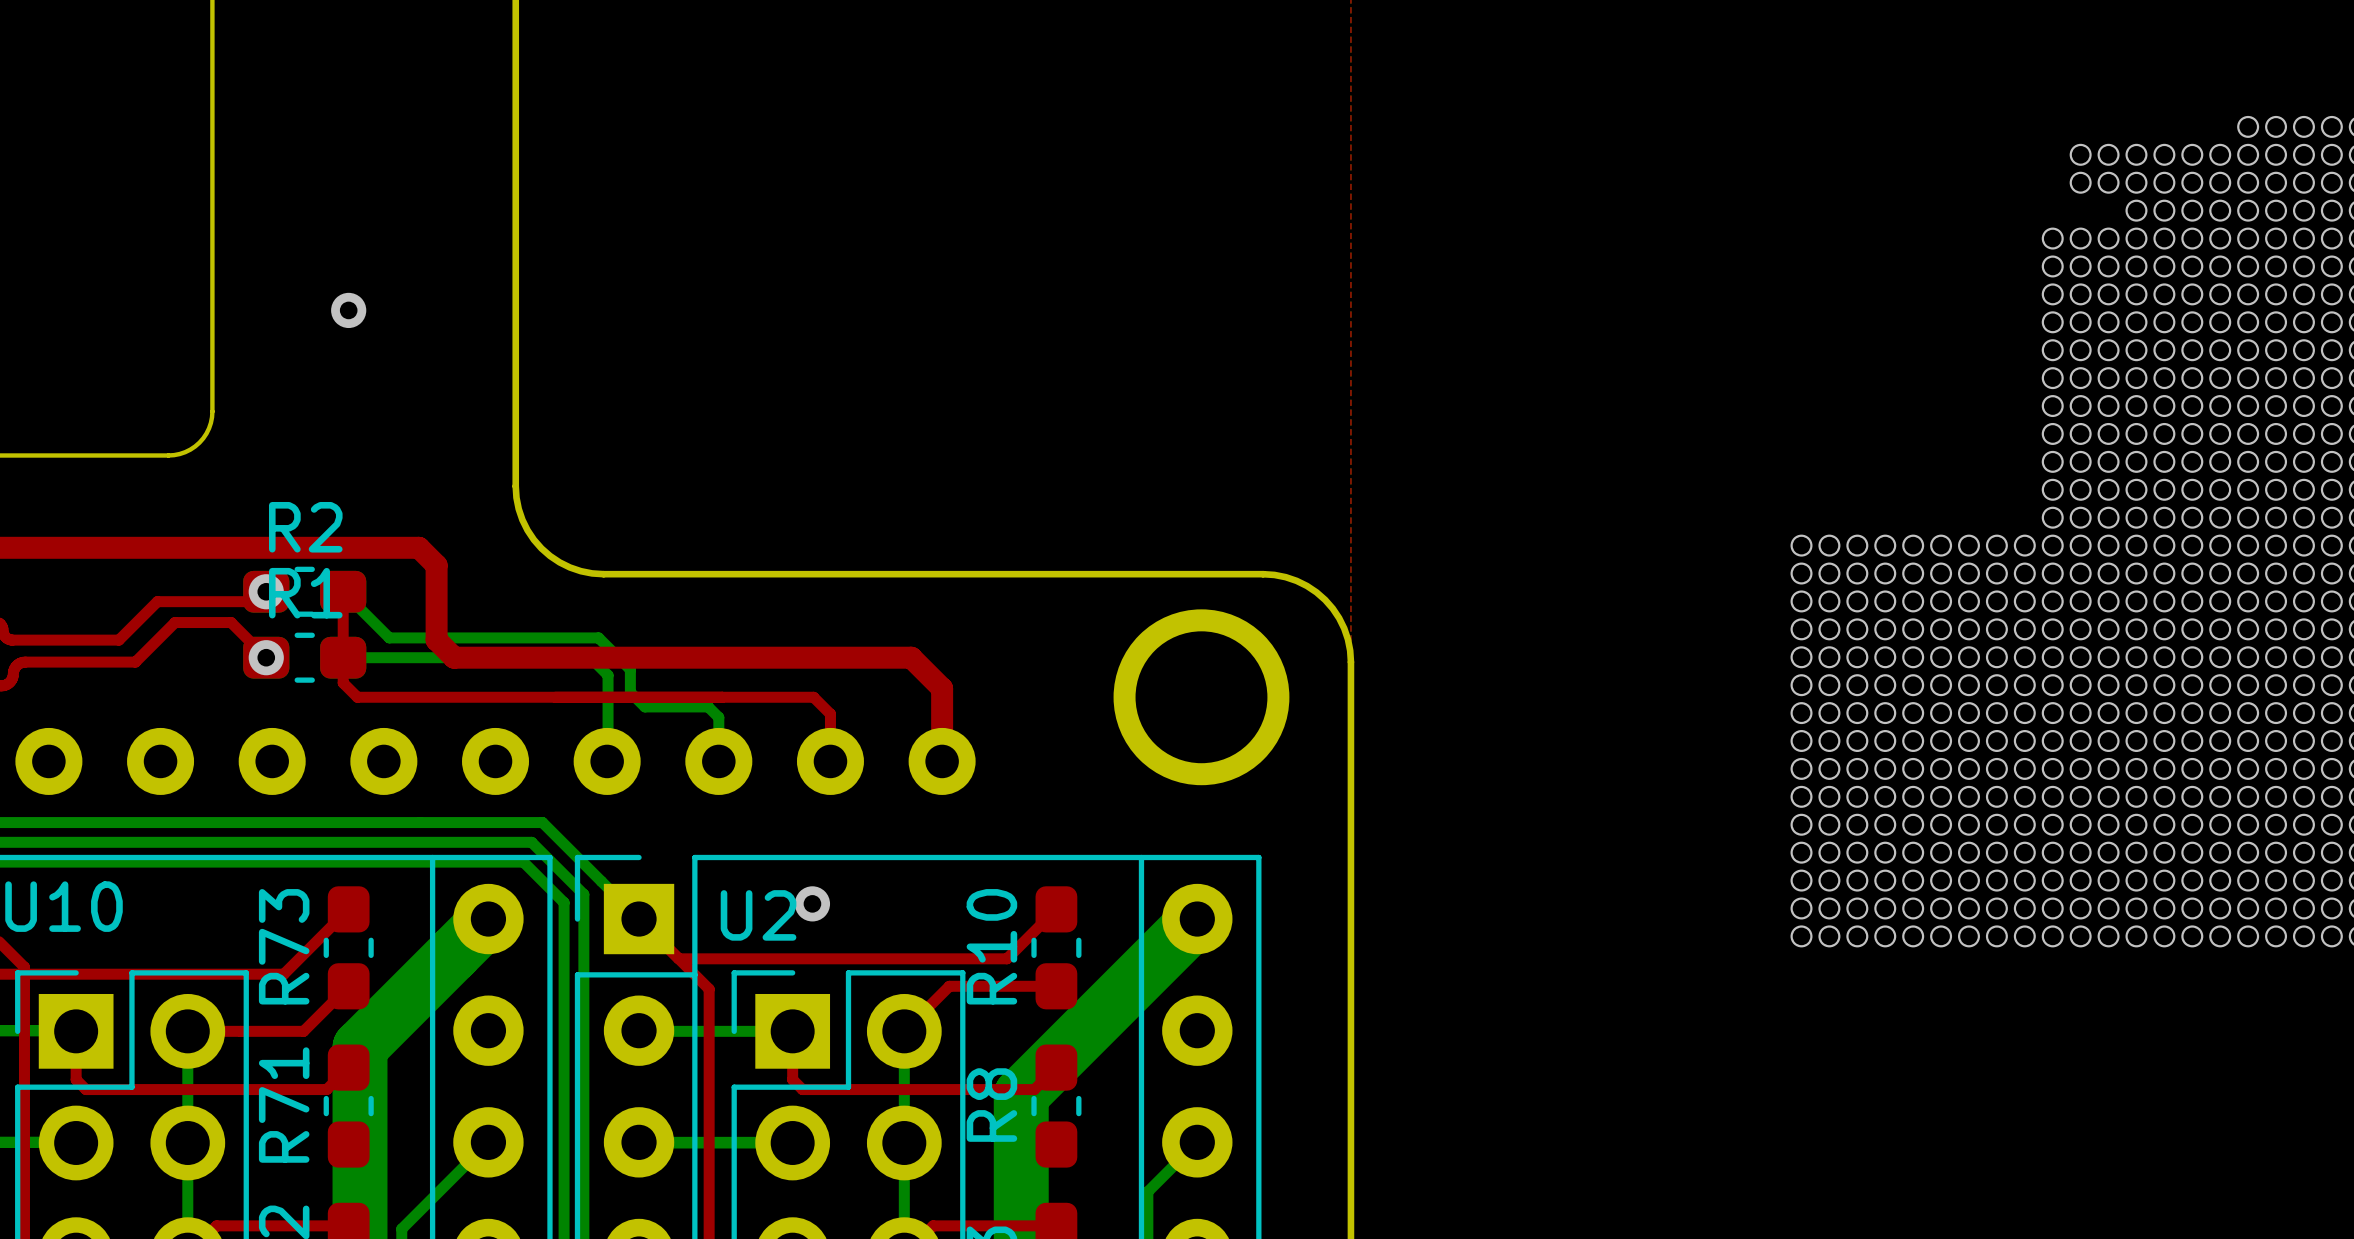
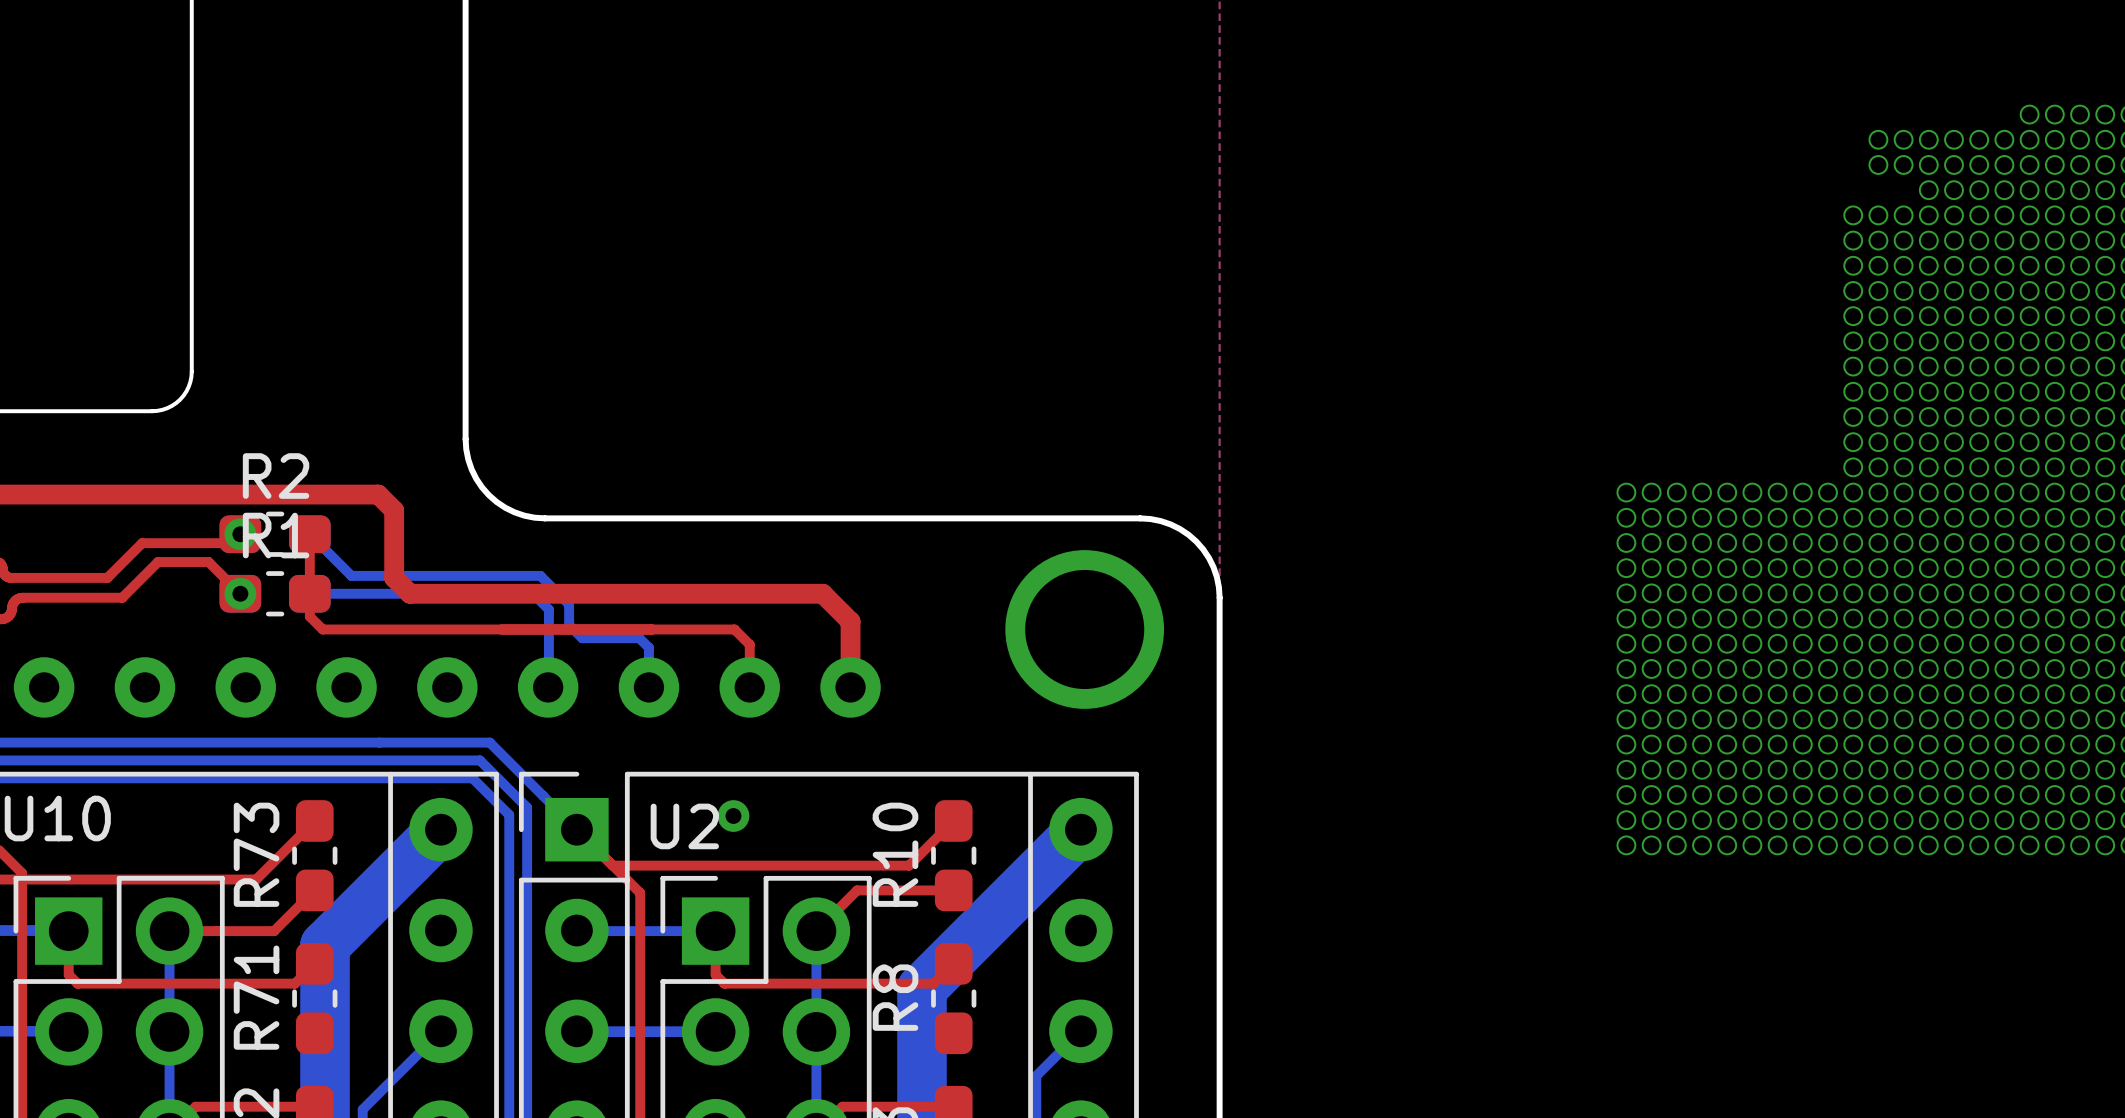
via: (348, 310) -> none

